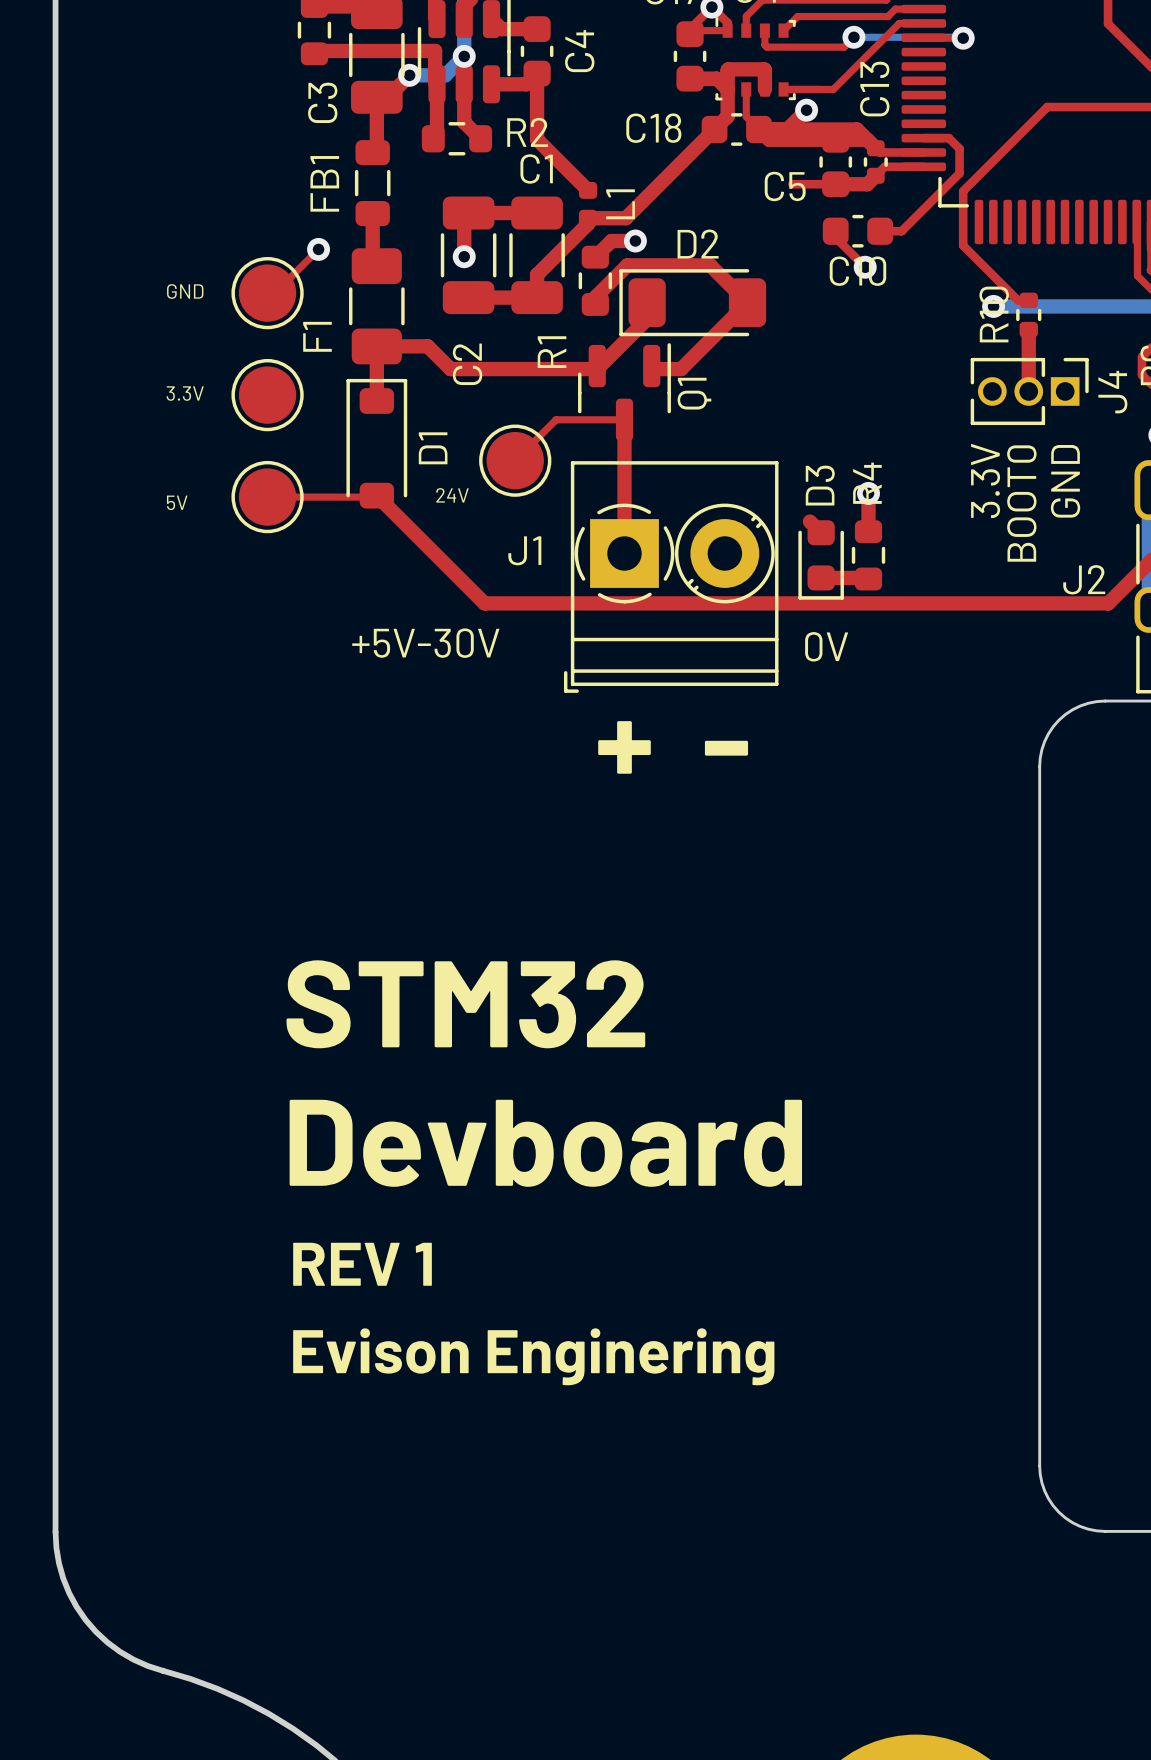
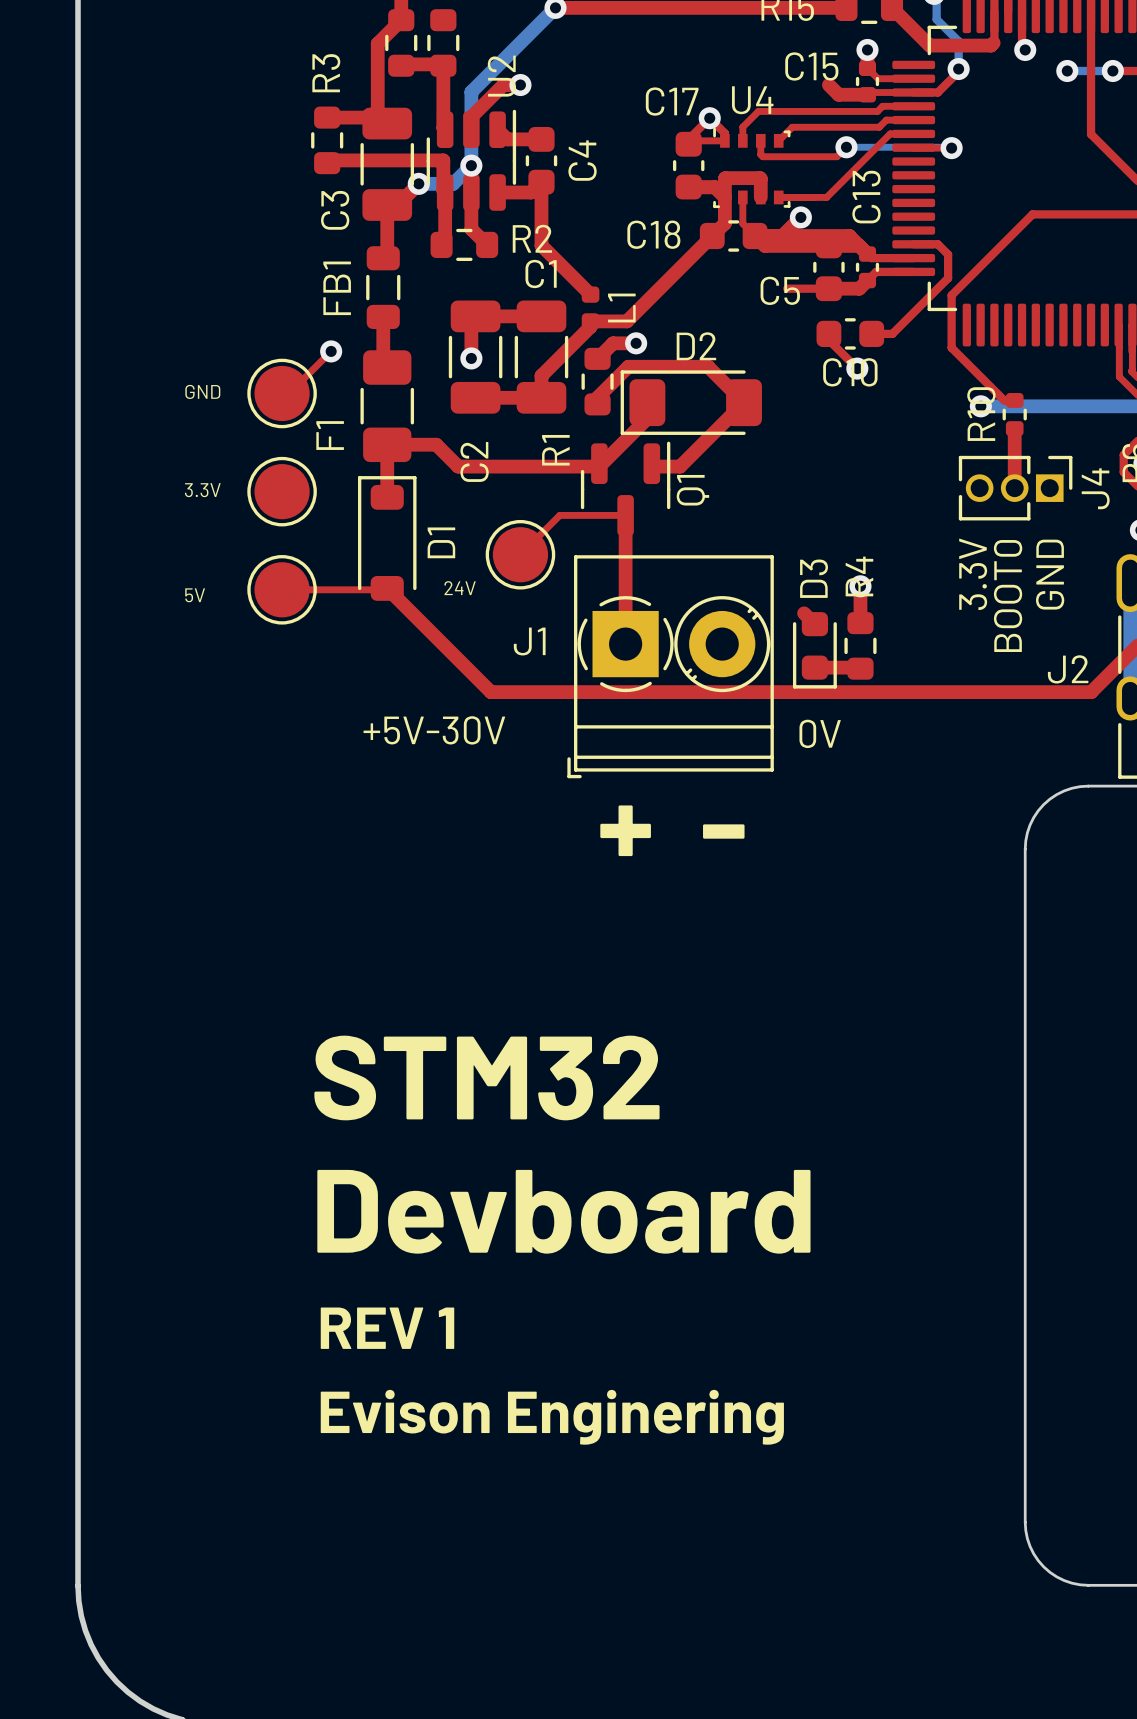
text position: STM32 (465, 1004) -> STM32 (486, 1077)
text position: Devboard (545, 1143) -> Devboard (563, 1211)
text position: REV 1 (362, 1264) -> REV 1 (387, 1328)
text position: Evison Enginering (533, 1356) -> Evison Enginering (552, 1417)

